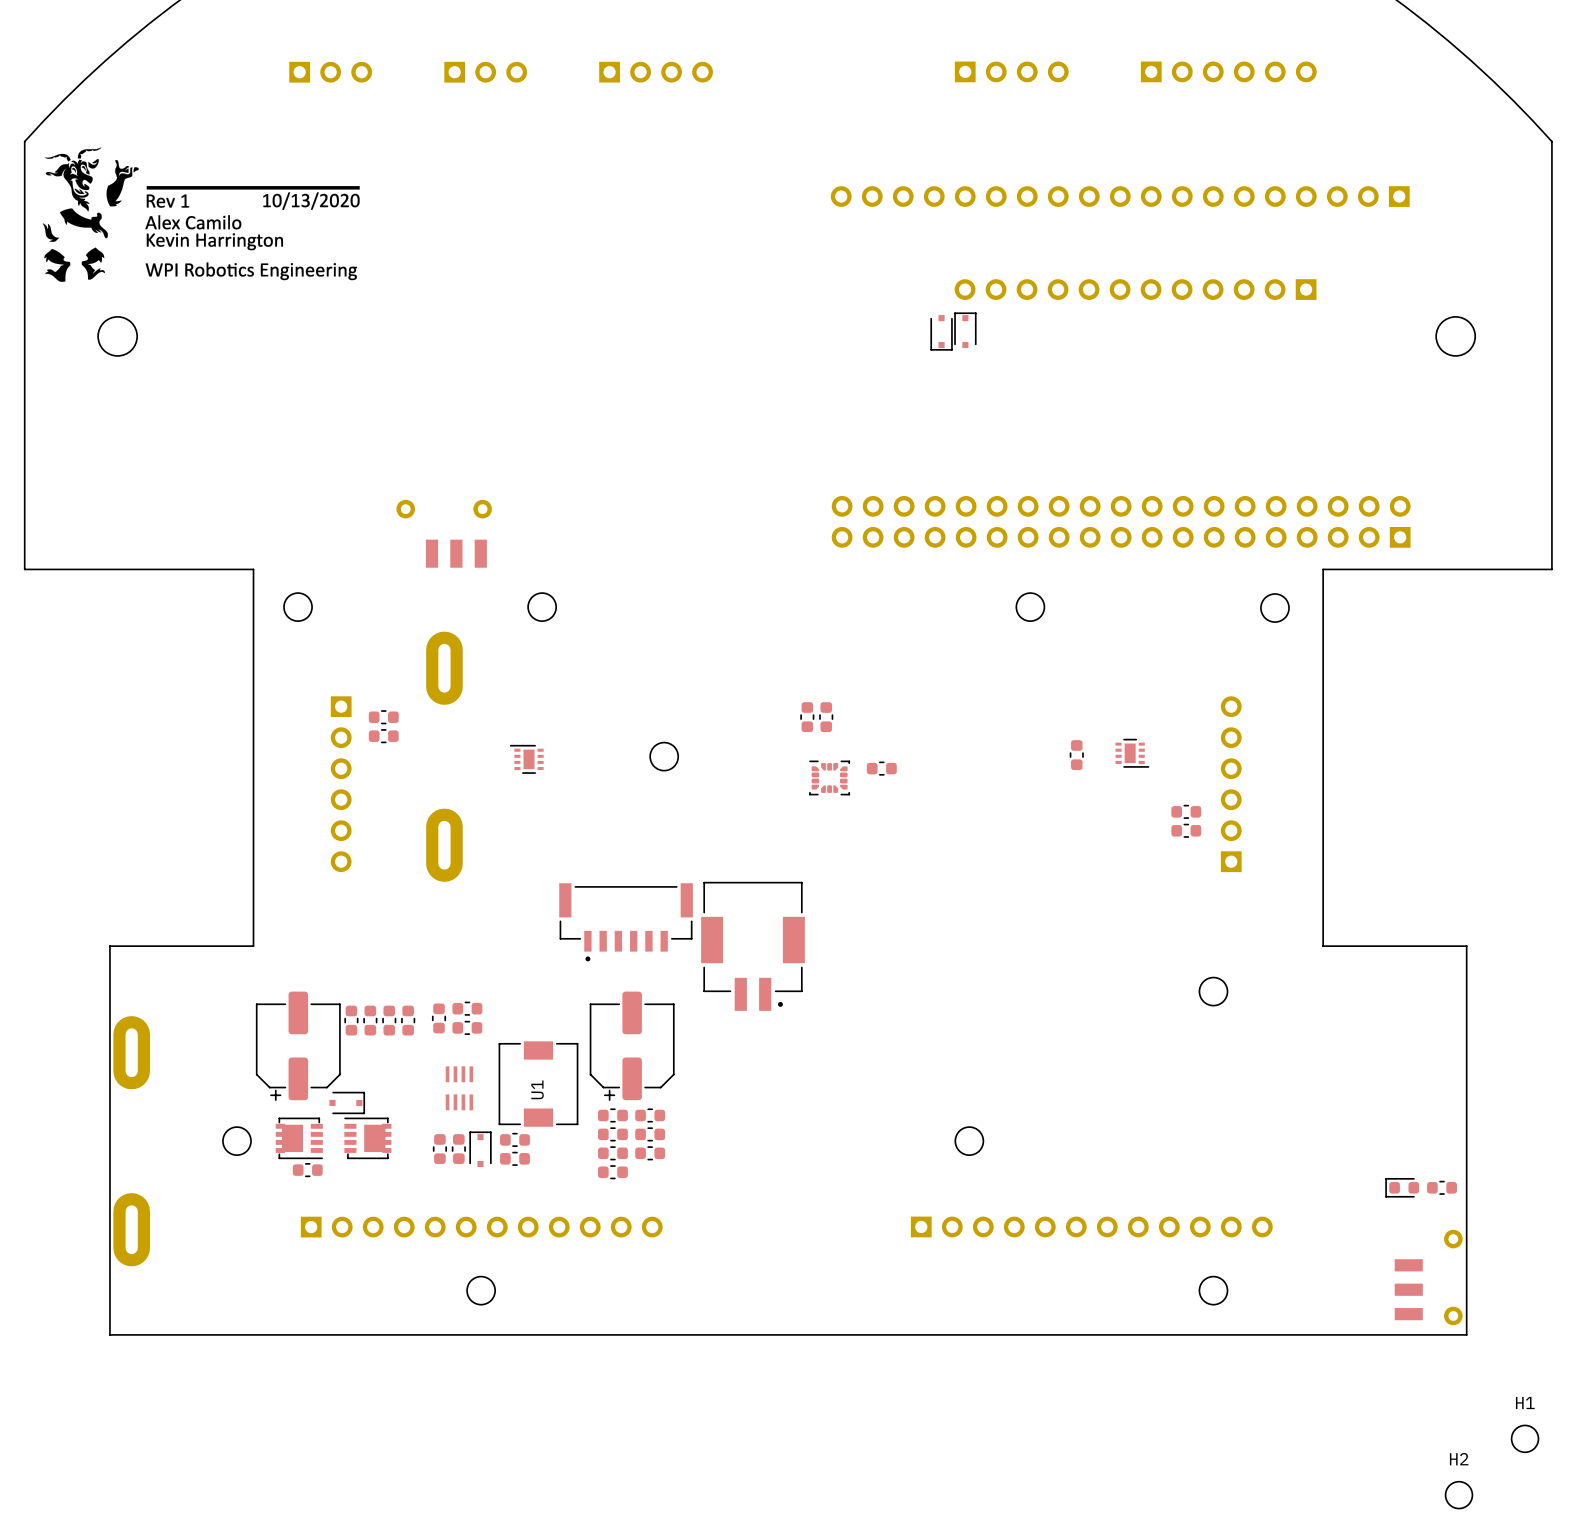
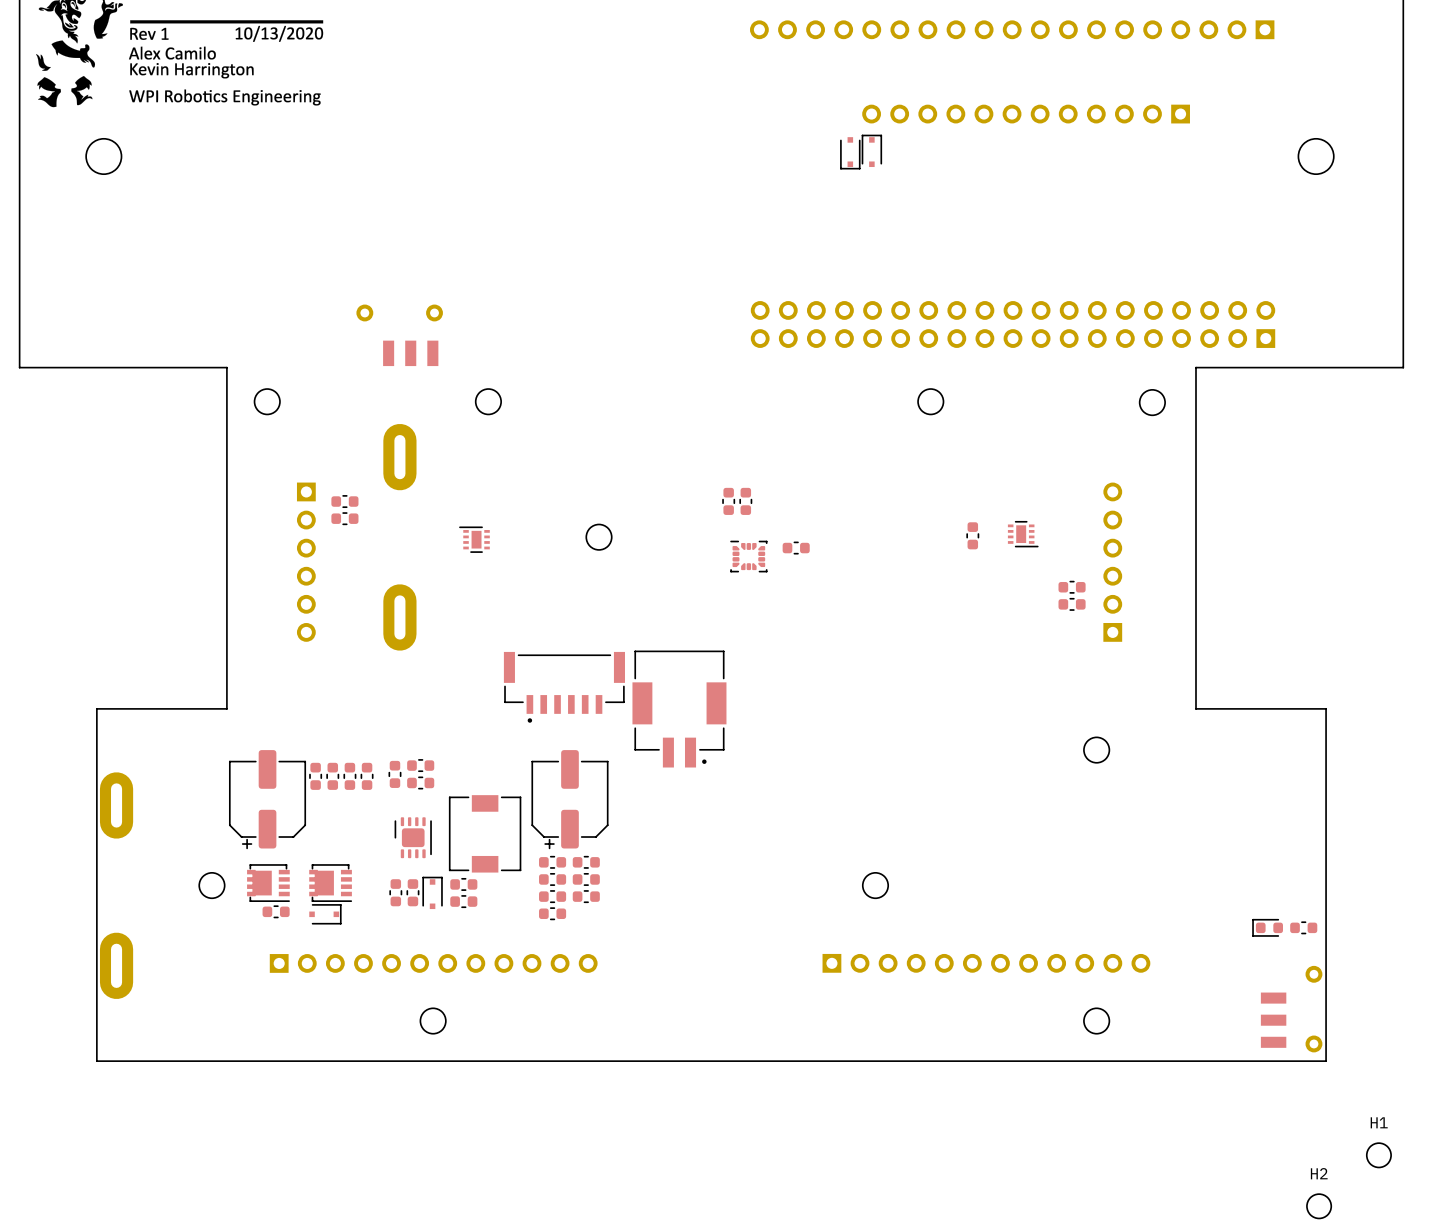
U1: (459, 1088) -> none
part: none -> (413, 837)
part position: (347, 1102) -> (325, 914)
part rotation: 0° (367, 1138) -> 180° (330, 883)

